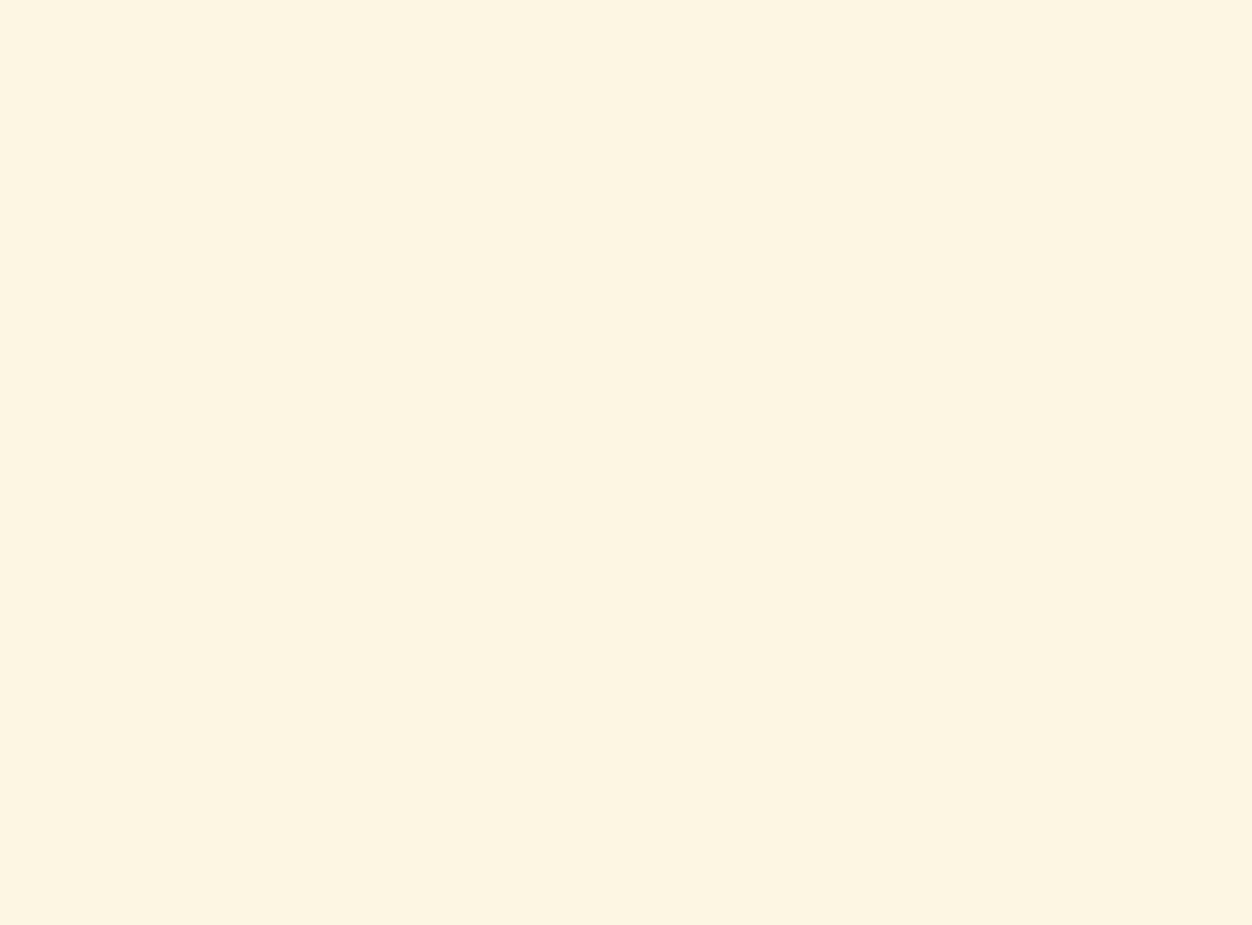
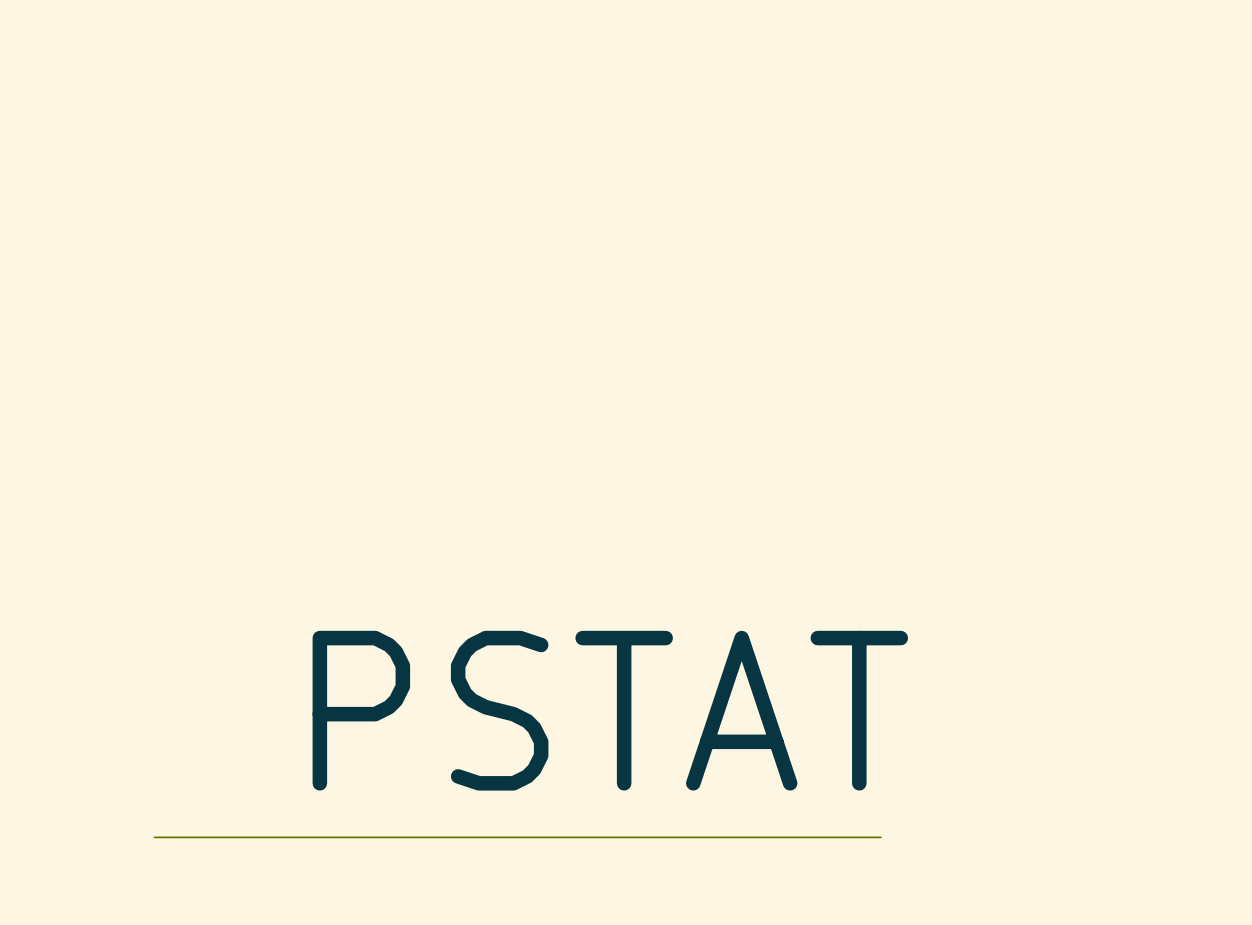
label: none -> PSTAT (610, 710)
wire: none -> (154, 837) (880, 837)

